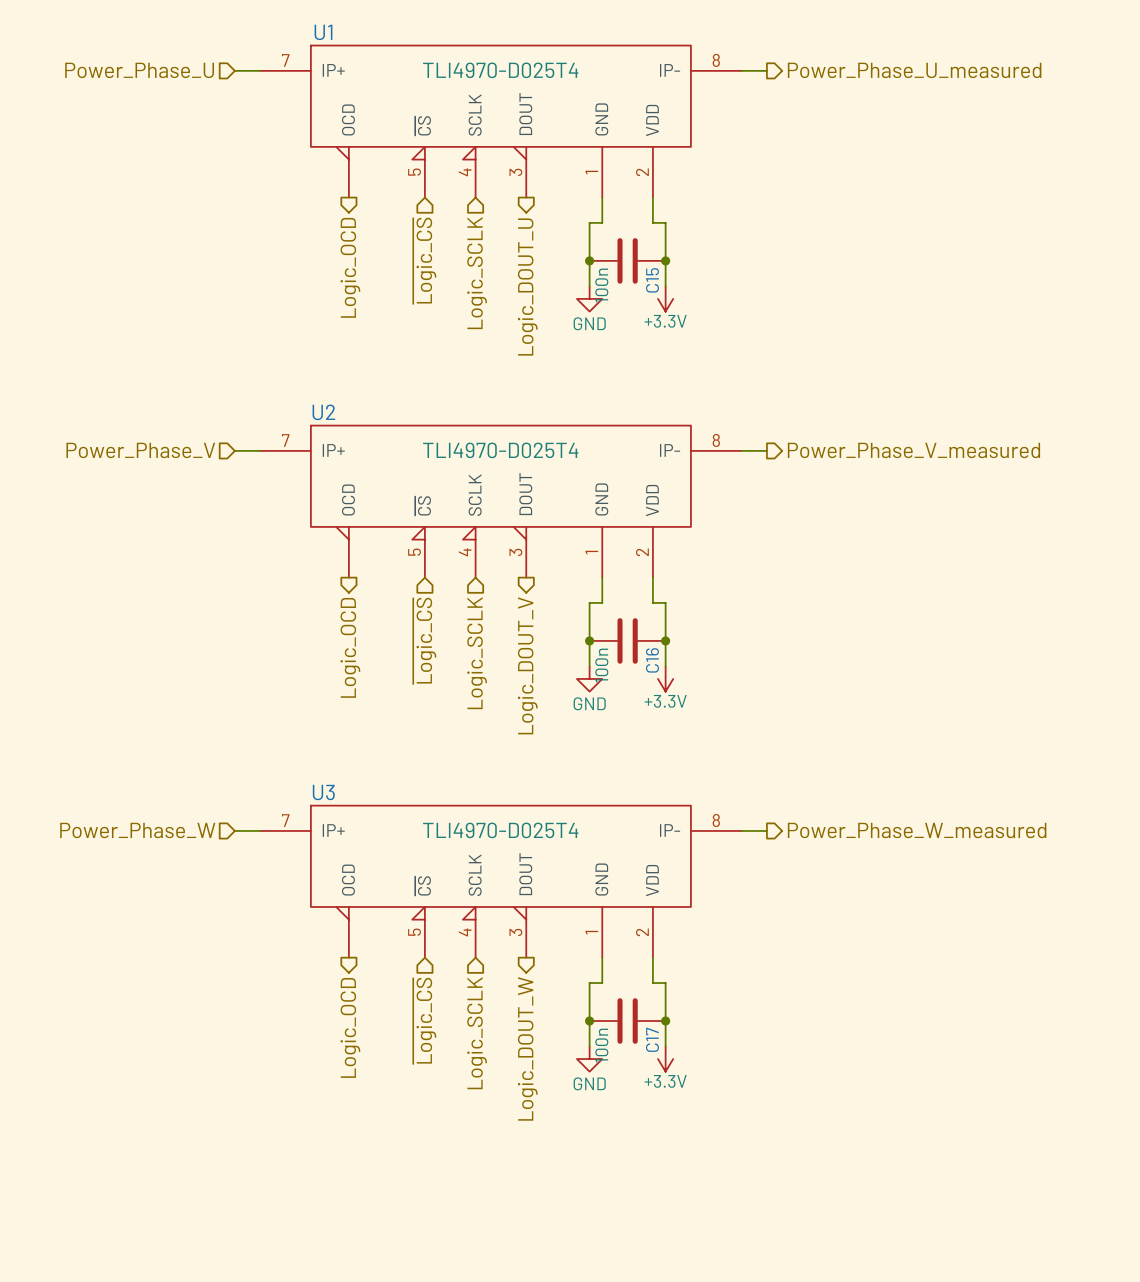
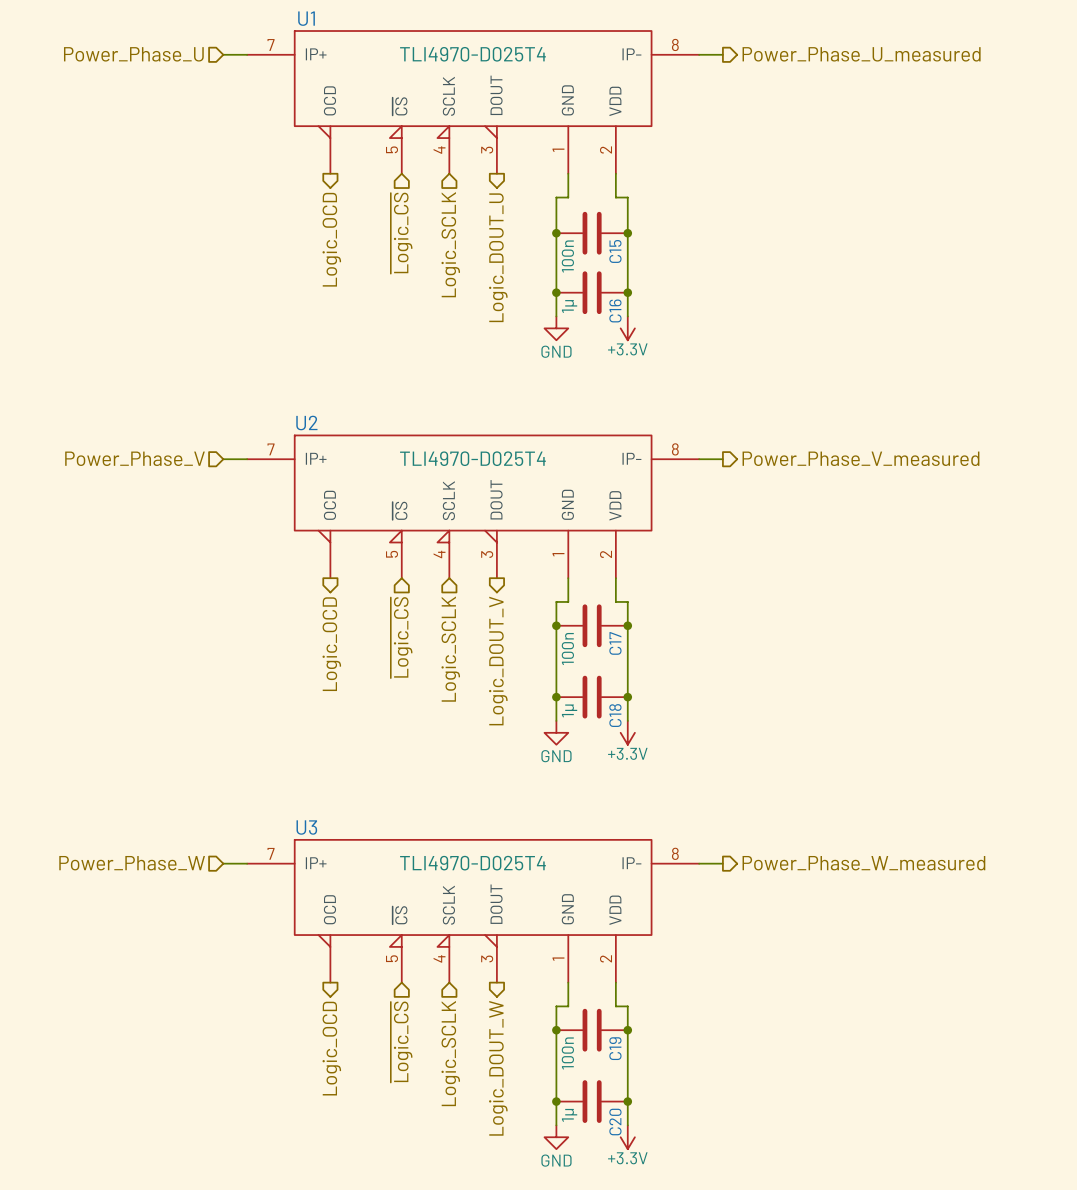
wire: none -> (556, 257) (556, 316)
wire: none -> (627, 257) (627, 316)
power symbol position: GND (589, 298) -> GND (556, 328)
power symbol position: +3.3V (665, 298) -> +3.3V (627, 328)
junction: none -> (556, 292)
junction: none -> (627, 292)
hierarchical label position: Power_Phase_V (140, 450) -> Power_Phase_V (135, 458)
wire: (234, 450) (260, 450) -> (223, 459) (247, 459)
wire: (741, 450) (766, 450) -> (699, 459) (722, 459)
hierarchical label position: Power_Phase_V_measured (913, 450) -> Power_Phase_V_measured (860, 458)
U2 position: (500, 501) -> (473, 506)
wire: (602, 577) (602, 602) (589, 602) (589, 653) -> (568, 578) (568, 601) (556, 601)
wire: (652, 577) (652, 602) (665, 602) (665, 653) -> (615, 578) (615, 601) (627, 601)
hierarchical label position: ~{Logic_CS} (424, 640) -> ~{Logic_CS} (401, 637)
junction position: (589, 640) -> (556, 625)
C16 position: (627, 640) -> (592, 292)
junction position: (665, 640) -> (627, 625)
hierarchical label position: Logic_OCD (350, 647) -> Logic_OCD (331, 644)
hierarchical label position: Logic_SCLK (477, 653) -> Logic_SCLK (450, 649)
hierarchical label position: Logic_DOUT_V (527, 665) -> Logic_DOUT_V (498, 661)
C16 value: 100n (601, 665) -> 1μ (569, 306)
wire: none -> (556, 613) (556, 720)
wire: none -> (627, 613) (627, 720)
power symbol position: GND (589, 678) -> GND (556, 732)
power symbol position: +3.3V (665, 678) -> +3.3V (627, 732)
junction: none -> (556, 697)
C18: none -> 1μ (592, 697)
junction: none -> (627, 697)
hierarchical label position: Power_Phase_W (137, 830) -> Power_Phase_W (132, 863)
wire: (234, 830) (260, 830) -> (223, 863) (247, 863)
wire: (741, 830) (766, 830) -> (699, 863) (722, 863)
hierarchical label position: Power_Phase_W_measured (917, 830) -> Power_Phase_W_measured (863, 863)
U3 position: (500, 881) -> (473, 911)
wire: (602, 957) (602, 983) (589, 983) (589, 1046) -> none
wire: (652, 957) (652, 983) (665, 983) (665, 1046) -> none
hierarchical label position: ~{Logic_CS} (424, 1020) -> ~{Logic_CS} (401, 1042)
junction: (589, 1021) -> none
C17 position: (627, 1021) -> (592, 625)
junction: (665, 1021) -> none
hierarchical label position: Logic_OCD (350, 1027) -> Logic_OCD (331, 1048)
hierarchical label position: Logic_SCLK (477, 1033) -> Logic_SCLK (450, 1053)
hierarchical label position: Logic_DOUT_W (527, 1048) -> Logic_DOUT_W (498, 1068)
power symbol: GND (589, 1059) -> none
wire: none -> (568, 982) (568, 1006) (556, 1006) (556, 1125)
wire: none -> (615, 982) (615, 1006) (627, 1006) (627, 1125)
power symbol: +3.3V (665, 1059) -> none
junction: none -> (556, 1030)
C19: none -> 100n (592, 1030)
junction: none -> (627, 1030)
junction: none -> (556, 1101)
C20: none -> 1μ (592, 1101)
junction: none -> (627, 1101)
power symbol: none -> GND (556, 1137)
power symbol: none -> +3.3V (627, 1137)

